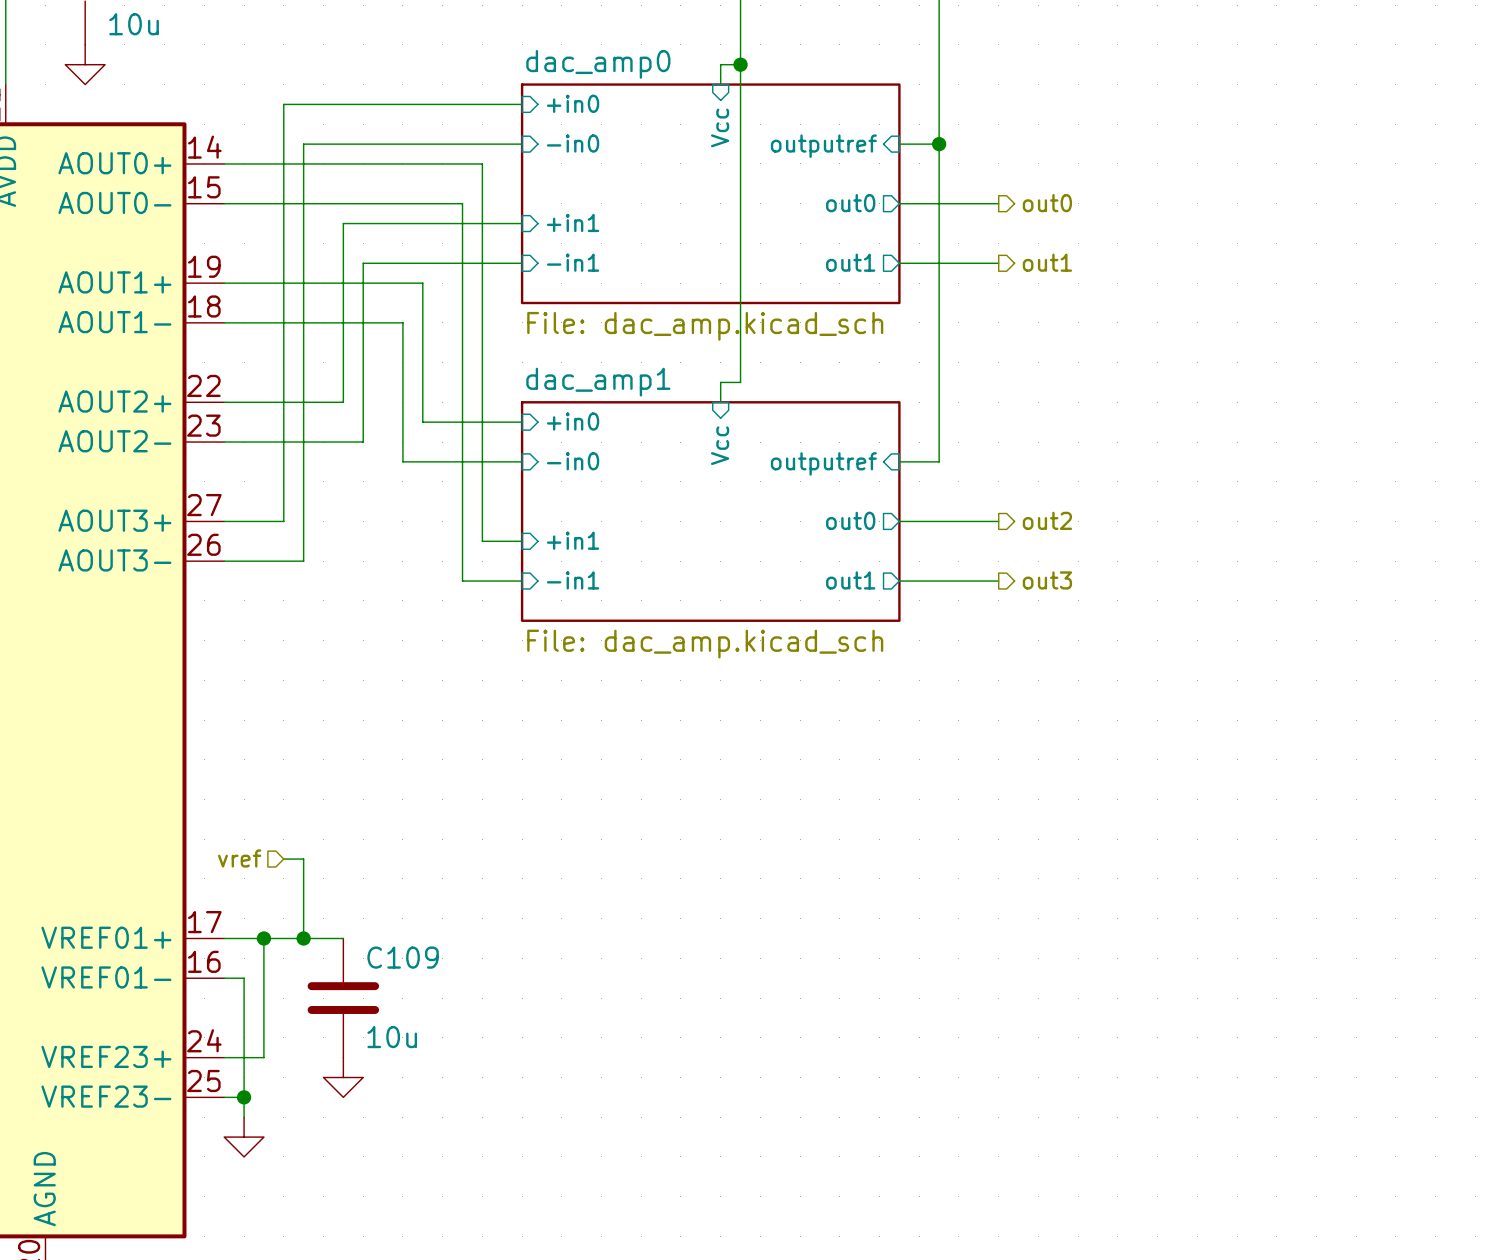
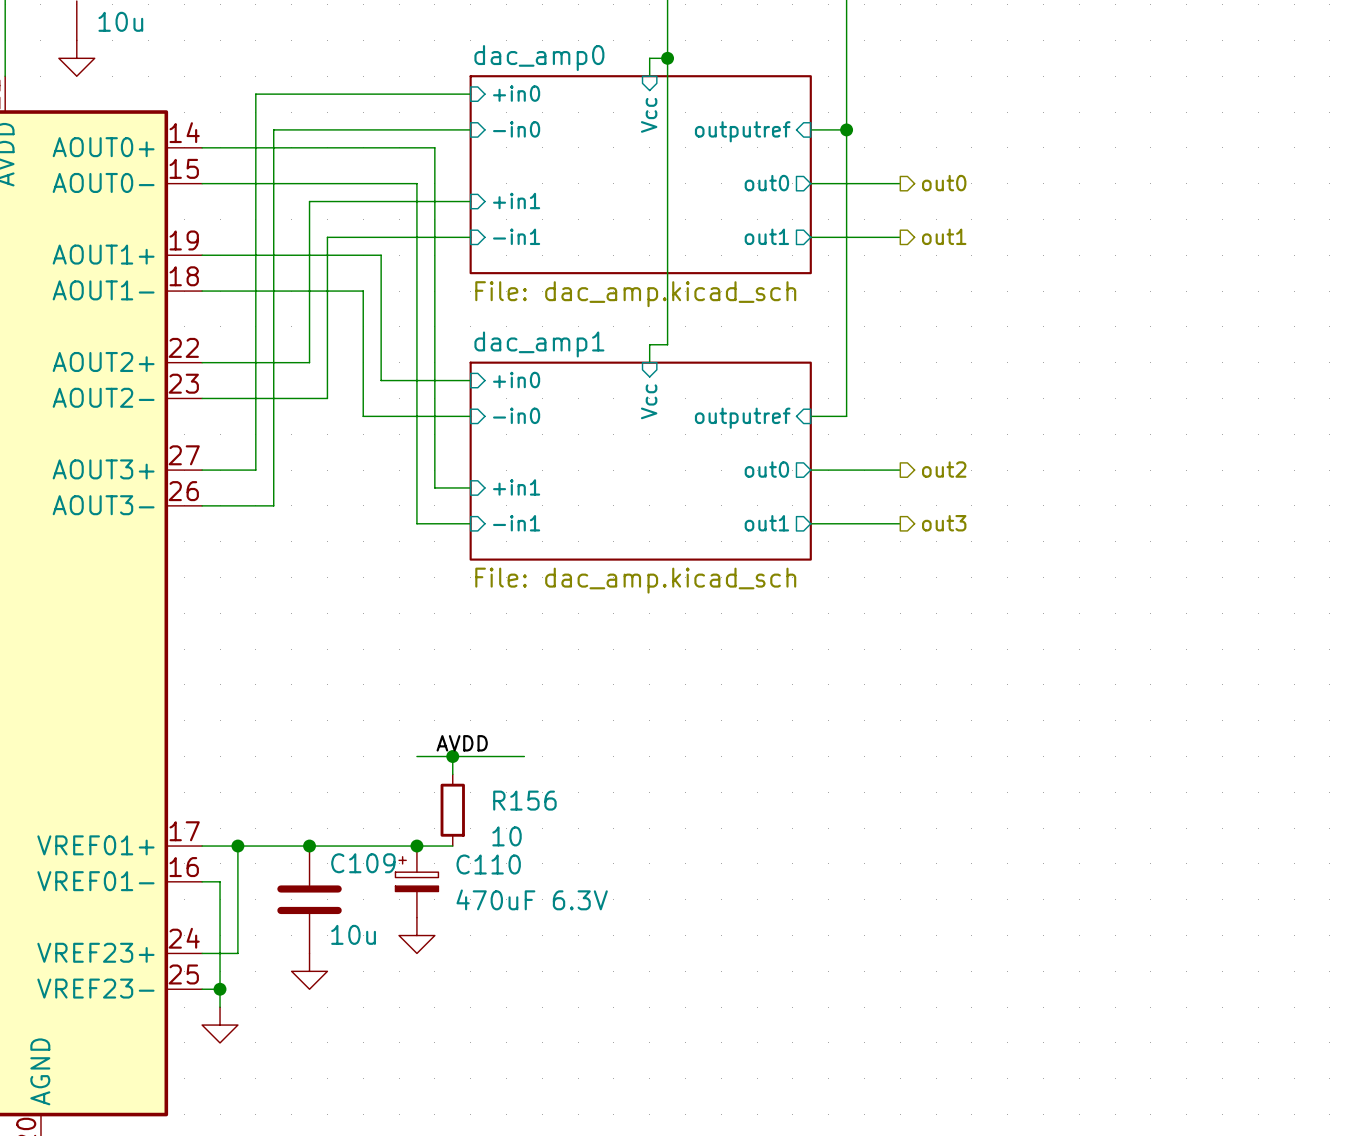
label: none -> AVDD (462, 743)
wire: none -> (416, 756) (524, 756)
wire: none -> (452, 756) (452, 774)
junction: none -> (452, 756)
hierarchical label: vref (239, 858) -> none
wire: (283, 859) (303, 859) (303, 938) -> none
R156: none -> 10 (452, 810)
junction position: (303, 938) -> (309, 846)
wire: none -> (309, 846) (452, 846)
junction: none -> (416, 846)
C110: none -> 470uF 6.3V (416, 881)
power symbol: none -> (416, 935)

